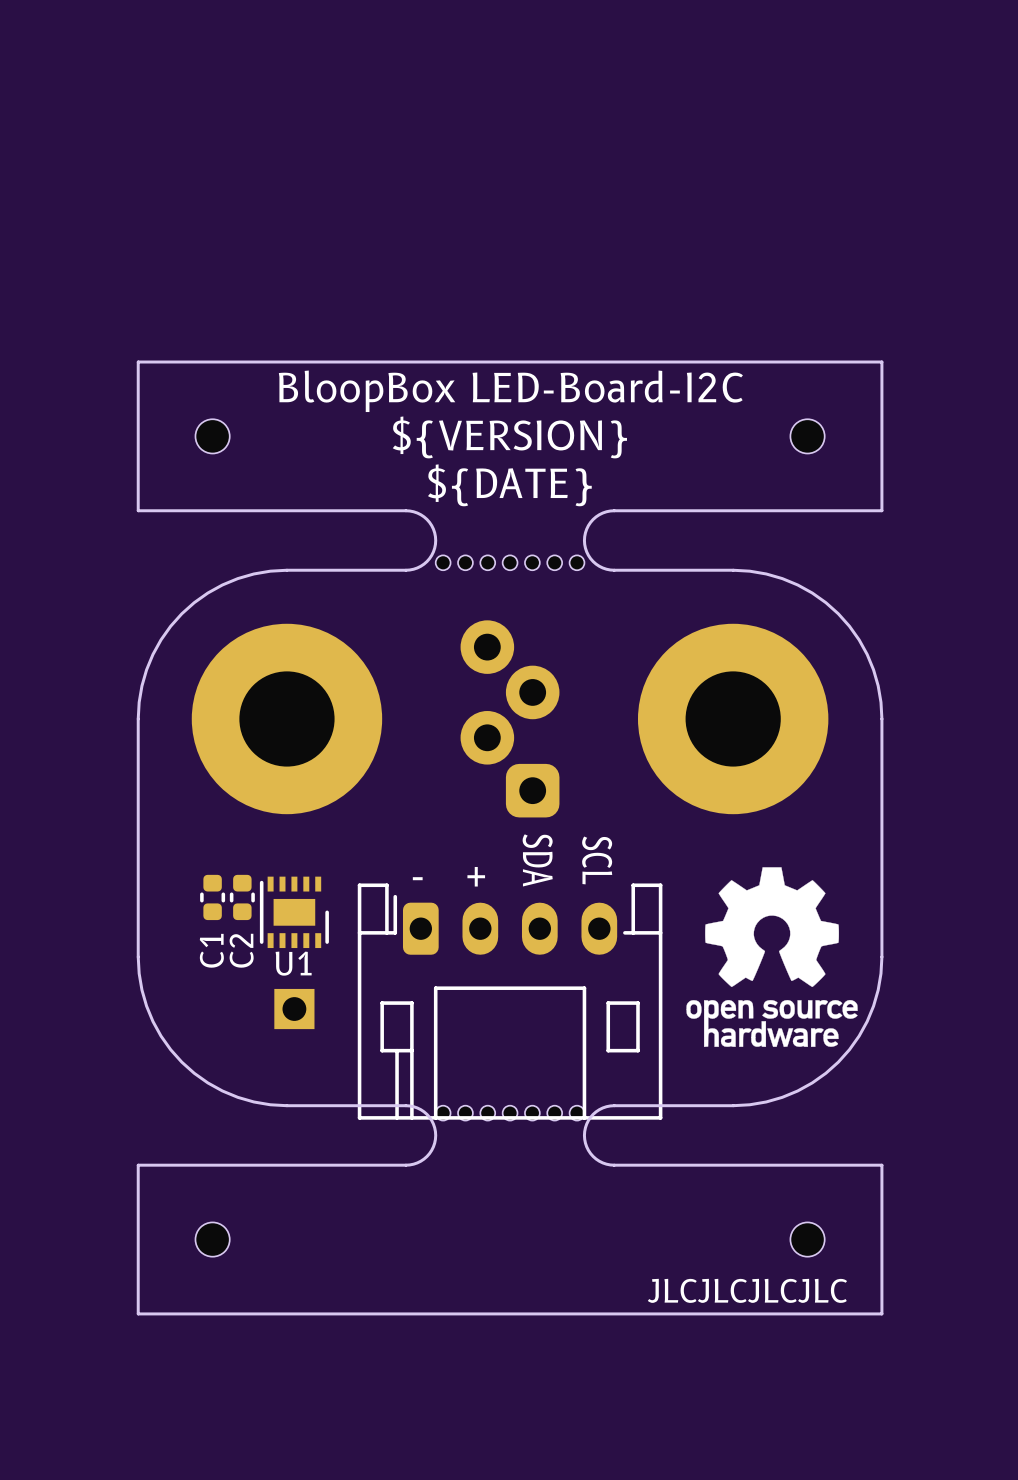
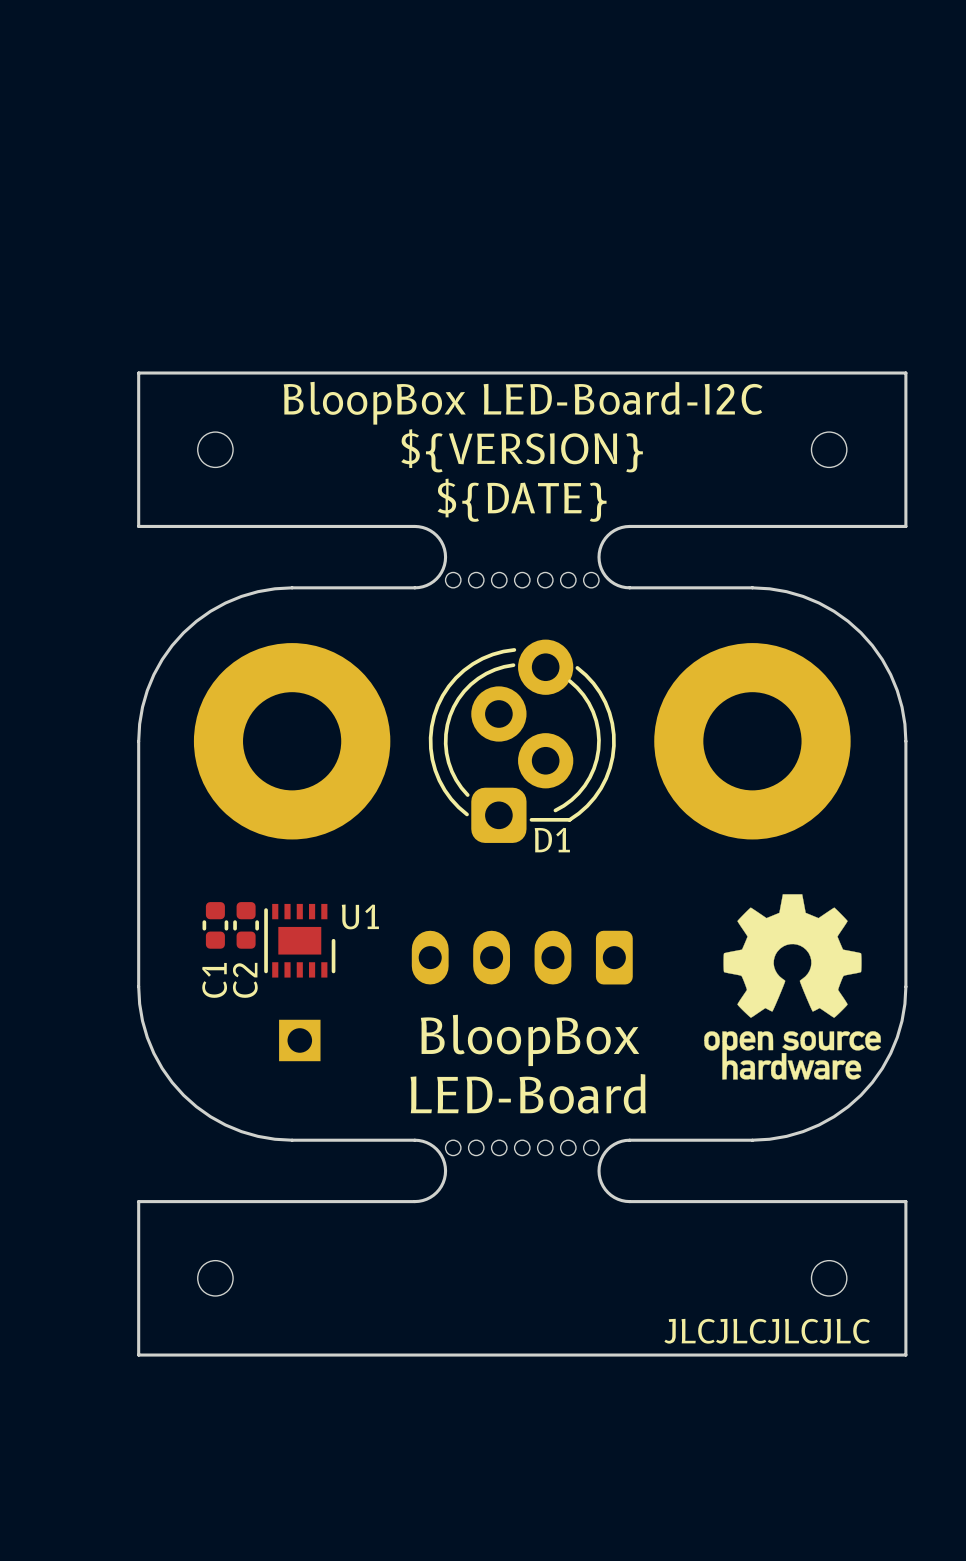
D1 side: bottom (510, 718) -> top (522, 741)
text: SDA (537, 860) -> none
text: SCL (597, 860) -> none
text: + (476, 876) -> none
text: - (417, 878) -> none
U1 name position: U1 (293, 963) -> U1 (360, 916)
part side: top (510, 1001) -> bottom (522, 957)
text: none -> BloopBox (530, 1040)
text: none -> LED-Board (528, 1093)

